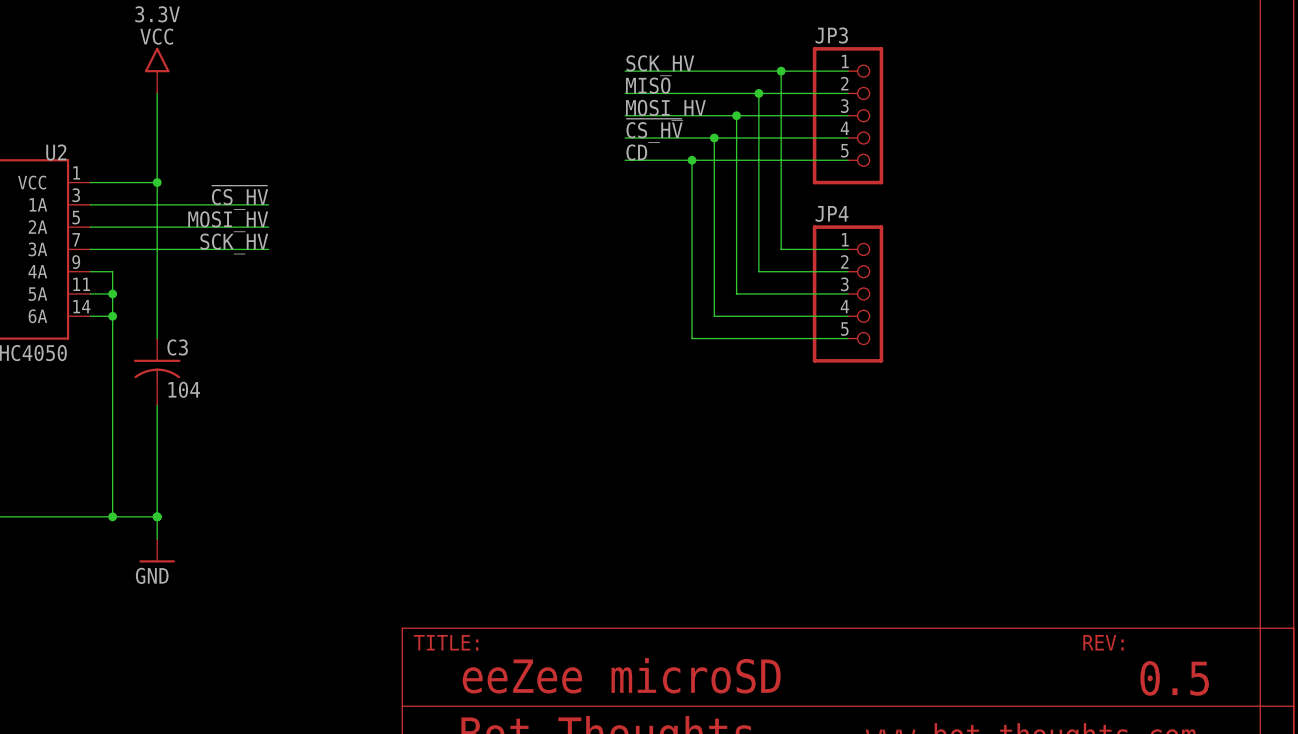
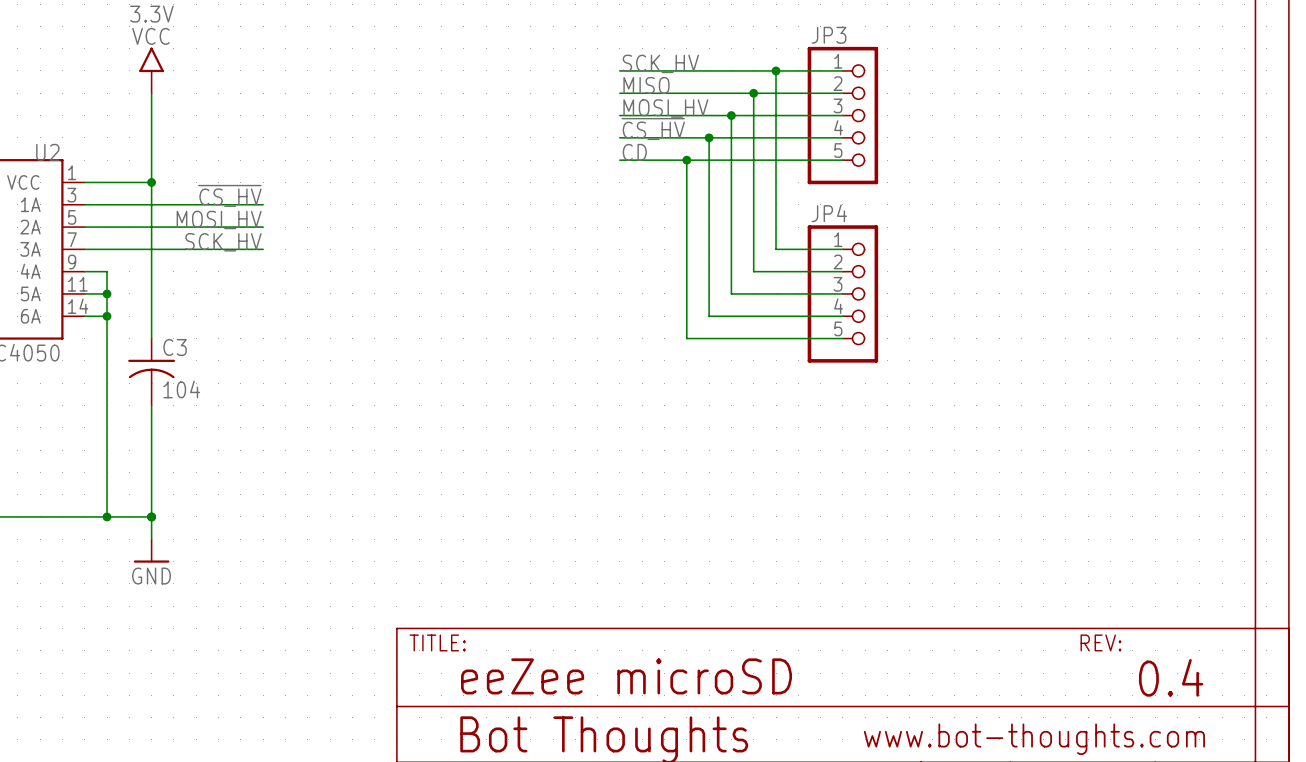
text: 0.5 (1174, 678) -> 0.4 (1171, 677)

